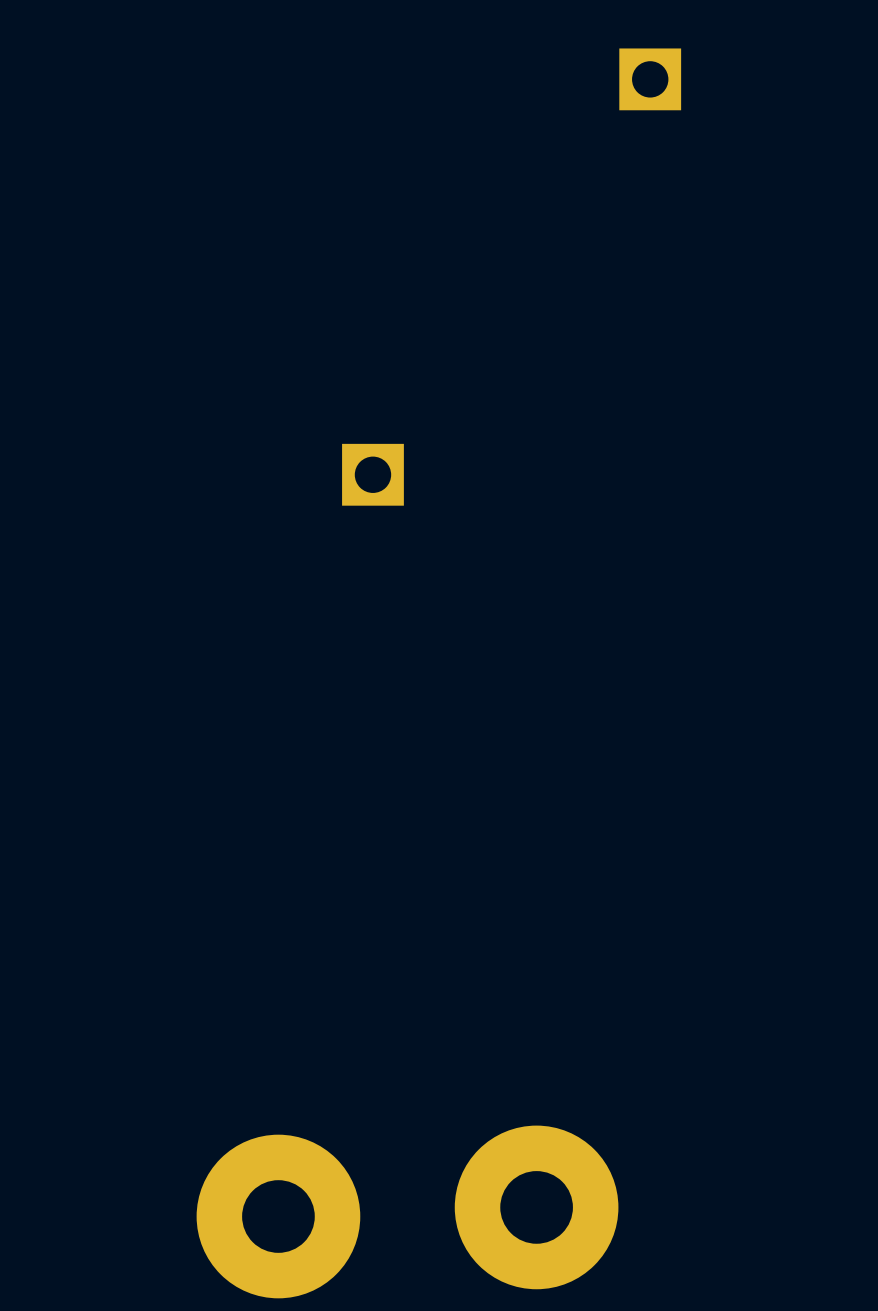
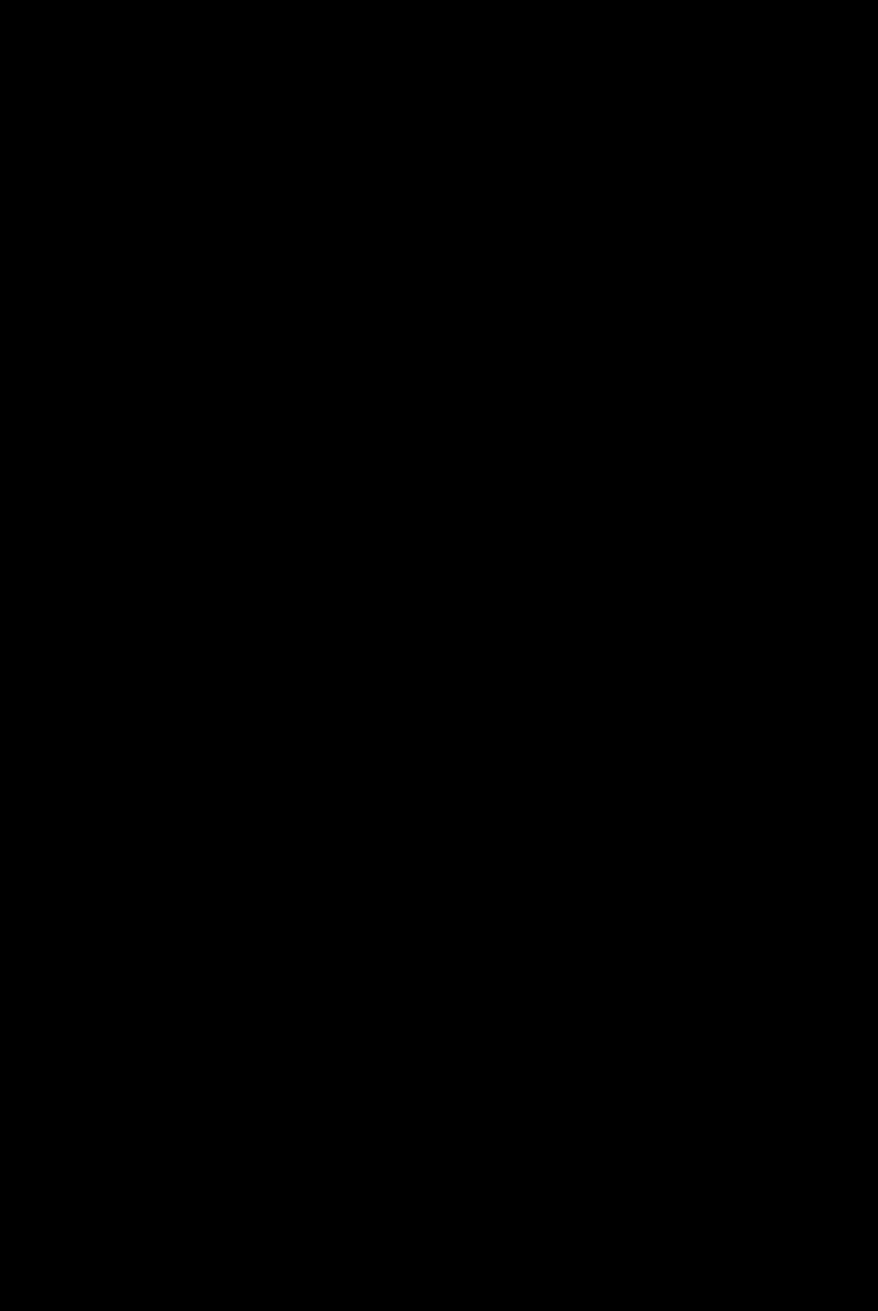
part: (650, 79) -> none
part: (372, 474) -> none
part: (536, 1207) -> none
part: (278, 1216) -> none

